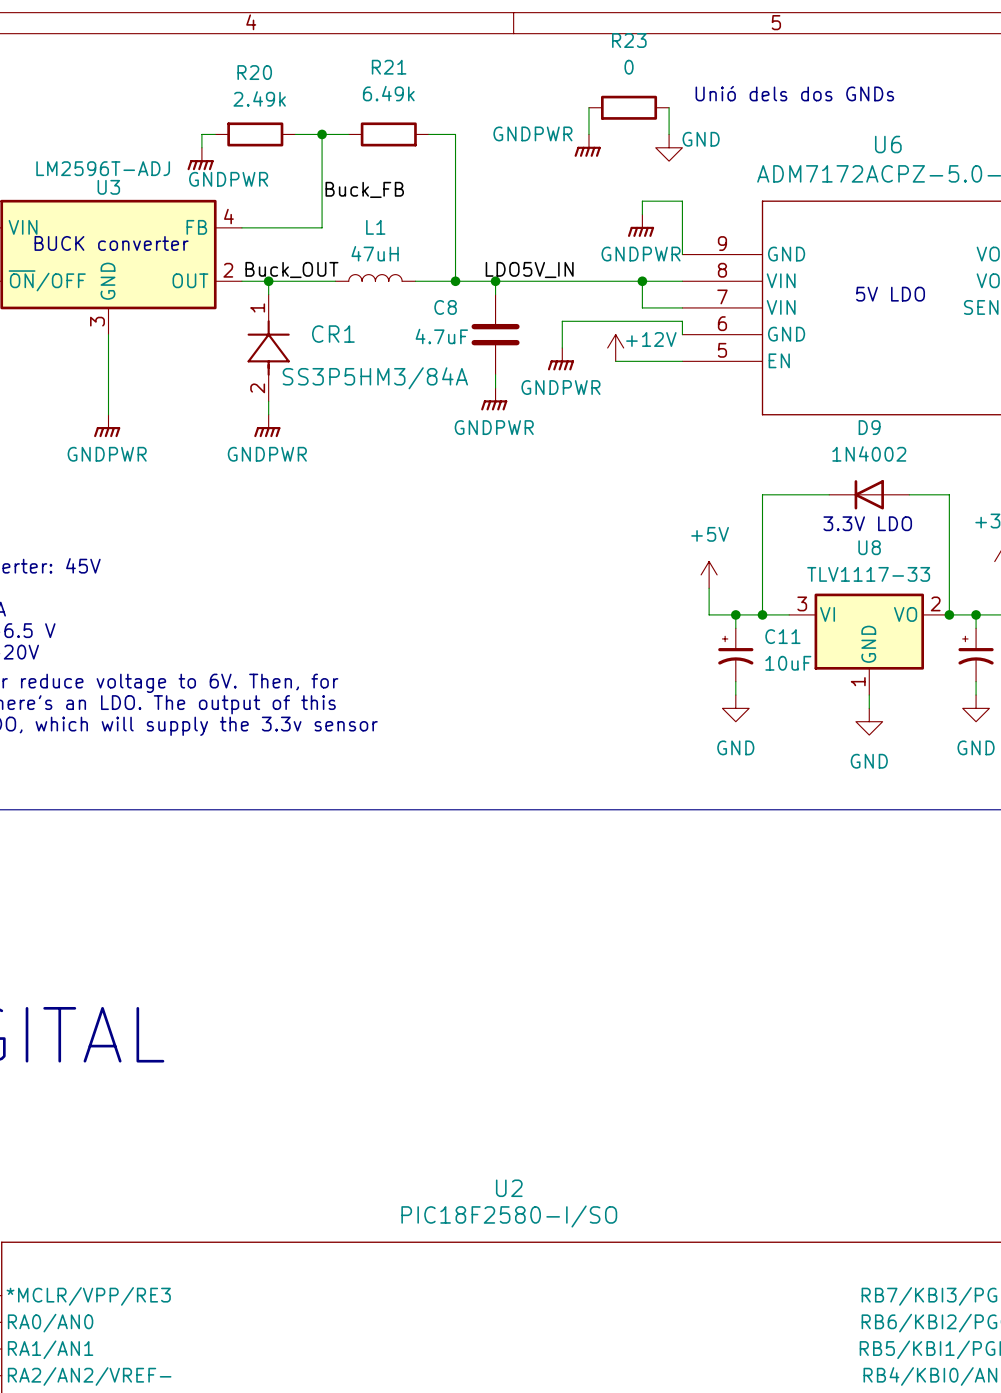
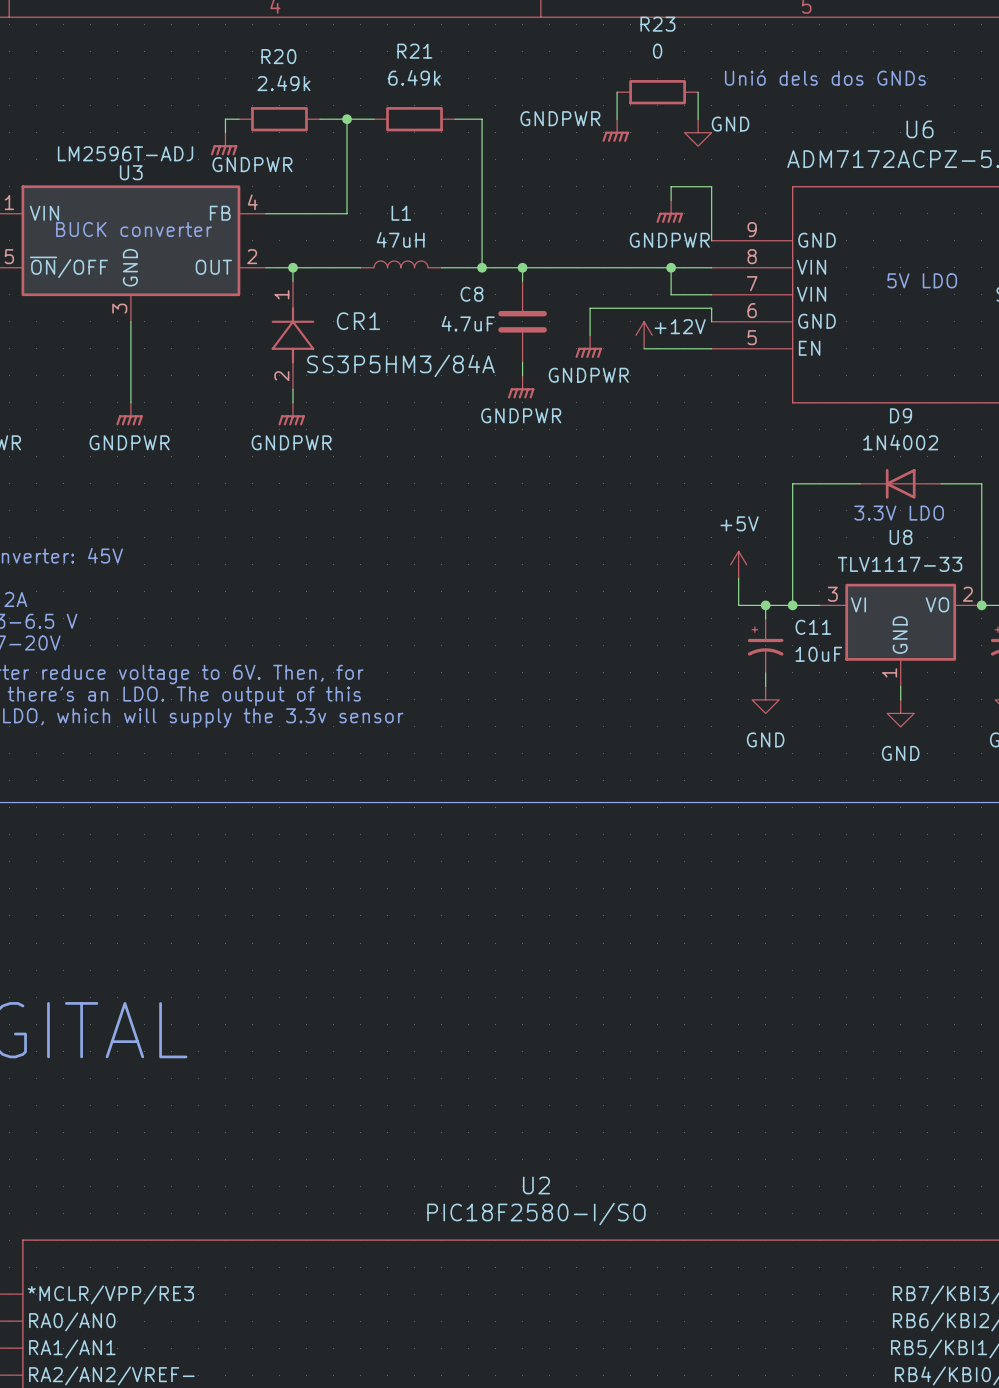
label: Buck_FB (364, 189) -> none
label: Buck_OUT (291, 269) -> none
label: LDO5V_IN (529, 269) -> none

